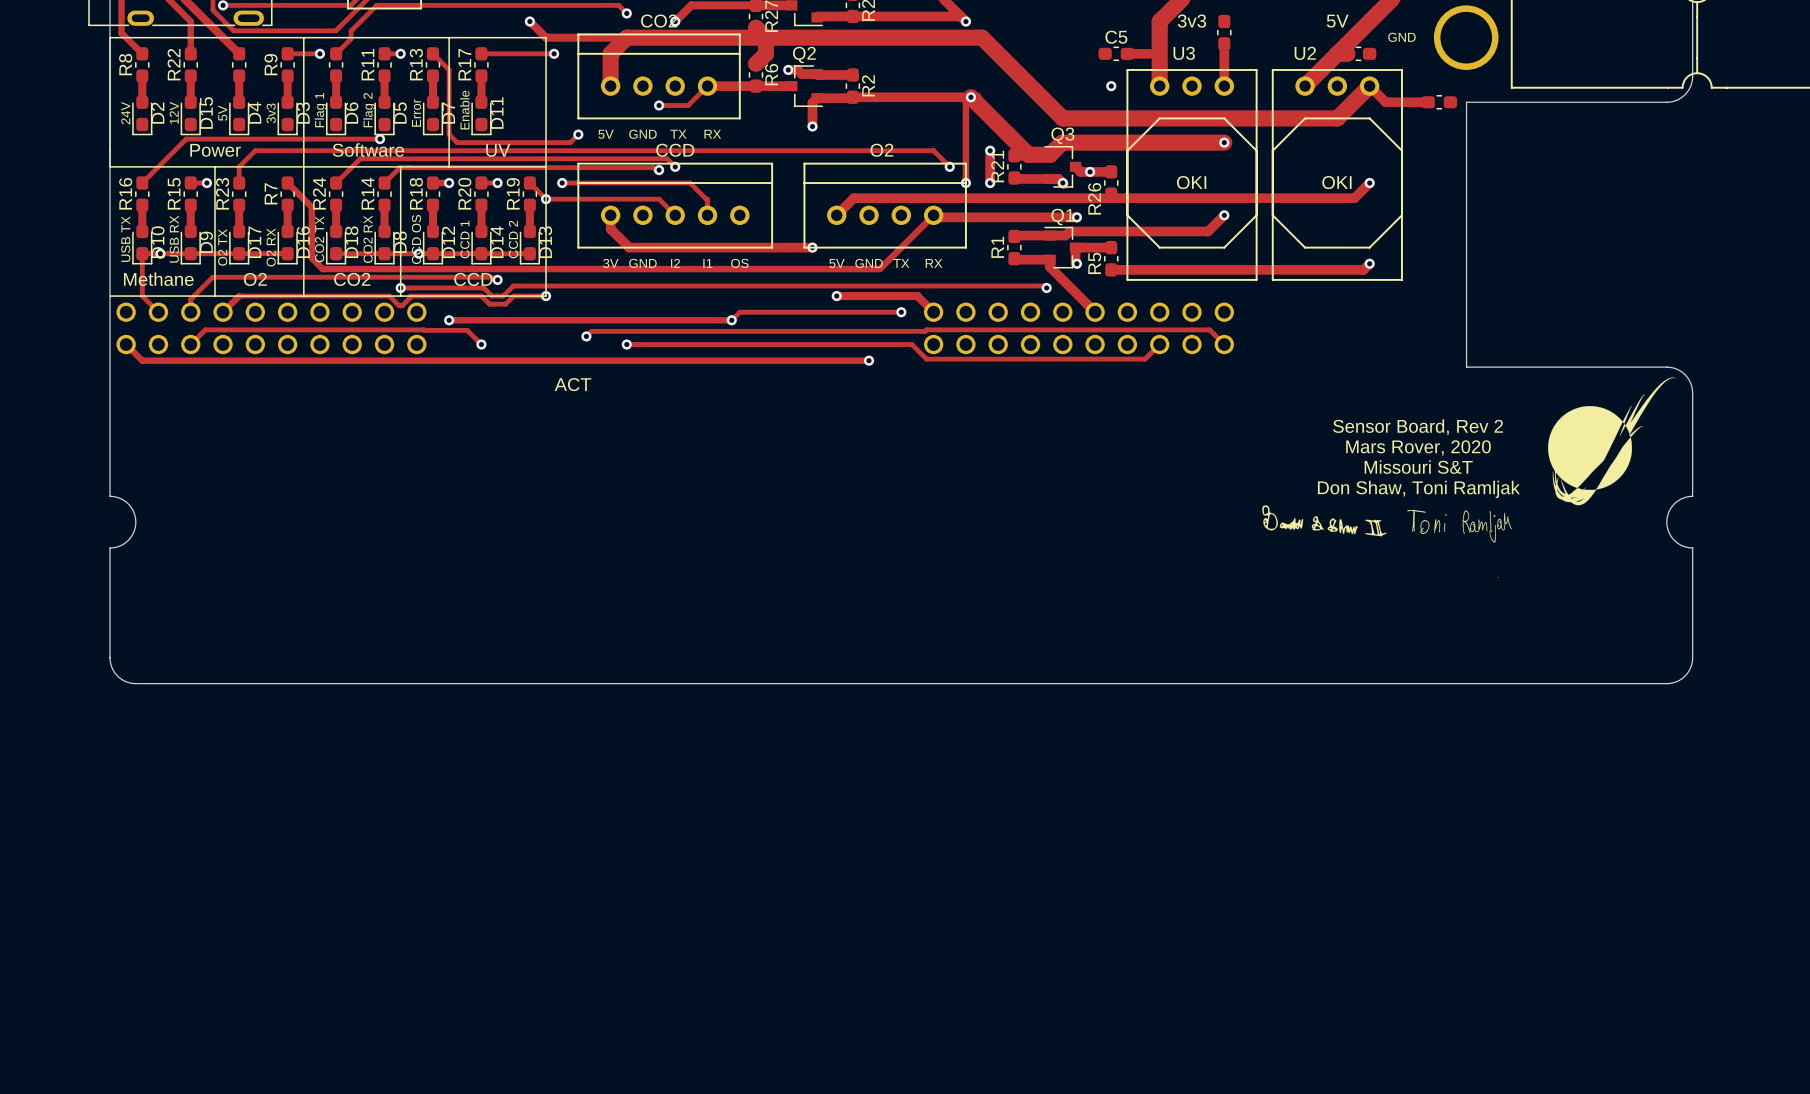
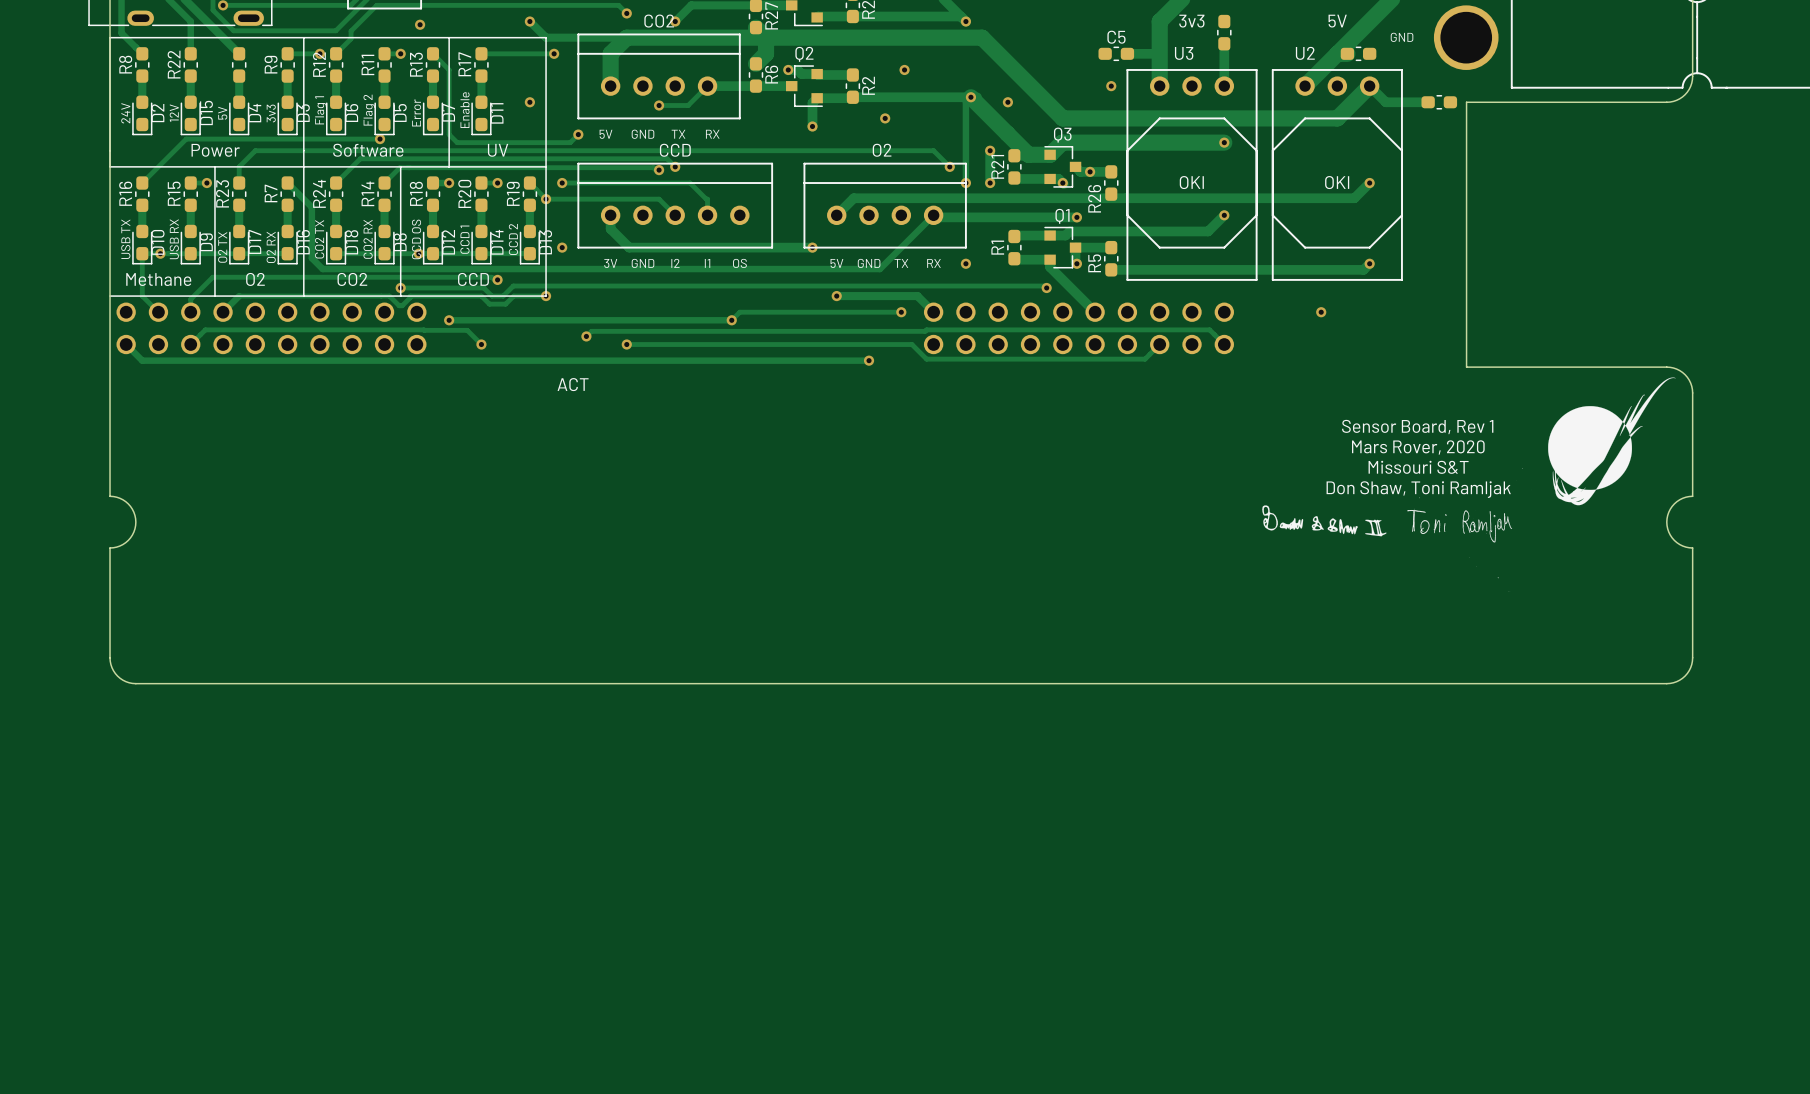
via: none -> (420, 24)
R12 name: none -> R12 (319, 64)
via: none -> (904, 69)
via: none -> (529, 102)
via: none -> (1007, 102)
via: none -> (885, 118)
via: none -> (562, 247)
via: none -> (965, 263)
via: none -> (1321, 312)
text: Sensor Board, Rev 2 (1418, 427) -> Sensor Board, Rev 1 (1417, 427)

